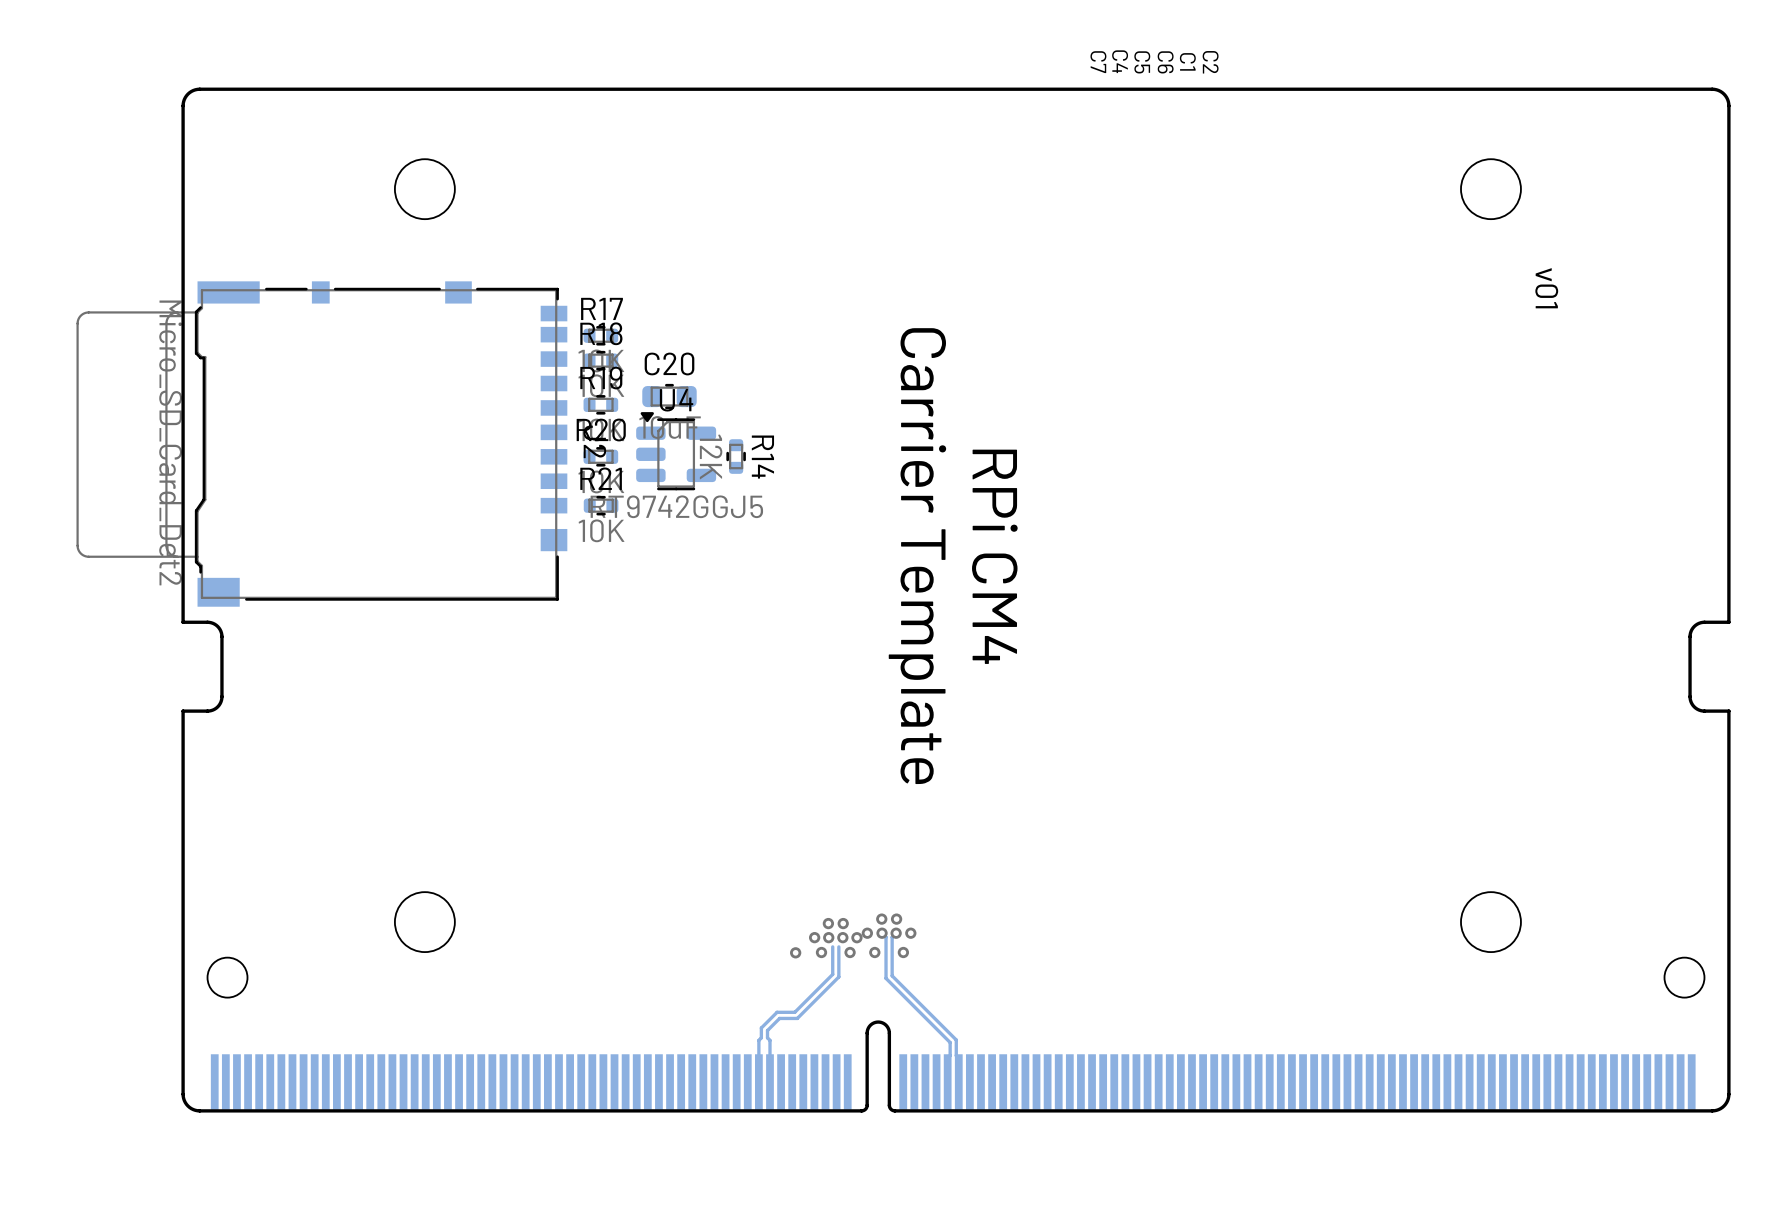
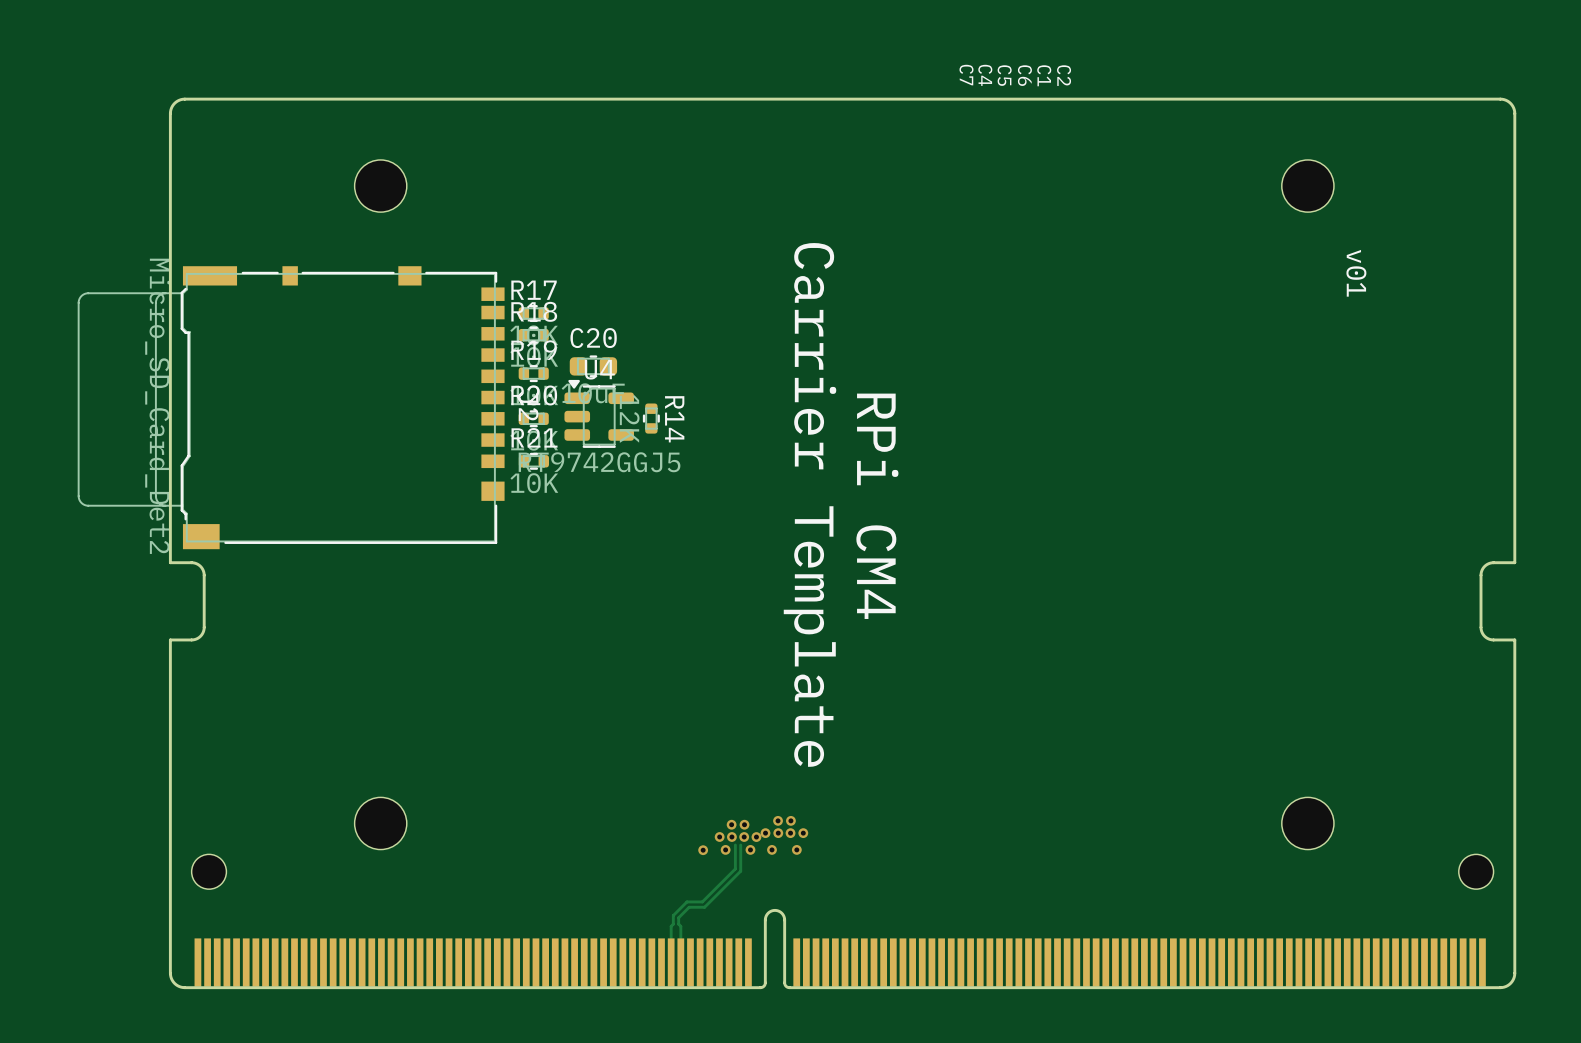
track: (882, 933) (886, 937) (886, 978) (950, 1042) (947, 1082) -> none
track: (896, 933) (892, 937) (892, 975) (956, 1039) (958, 1082) -> none

